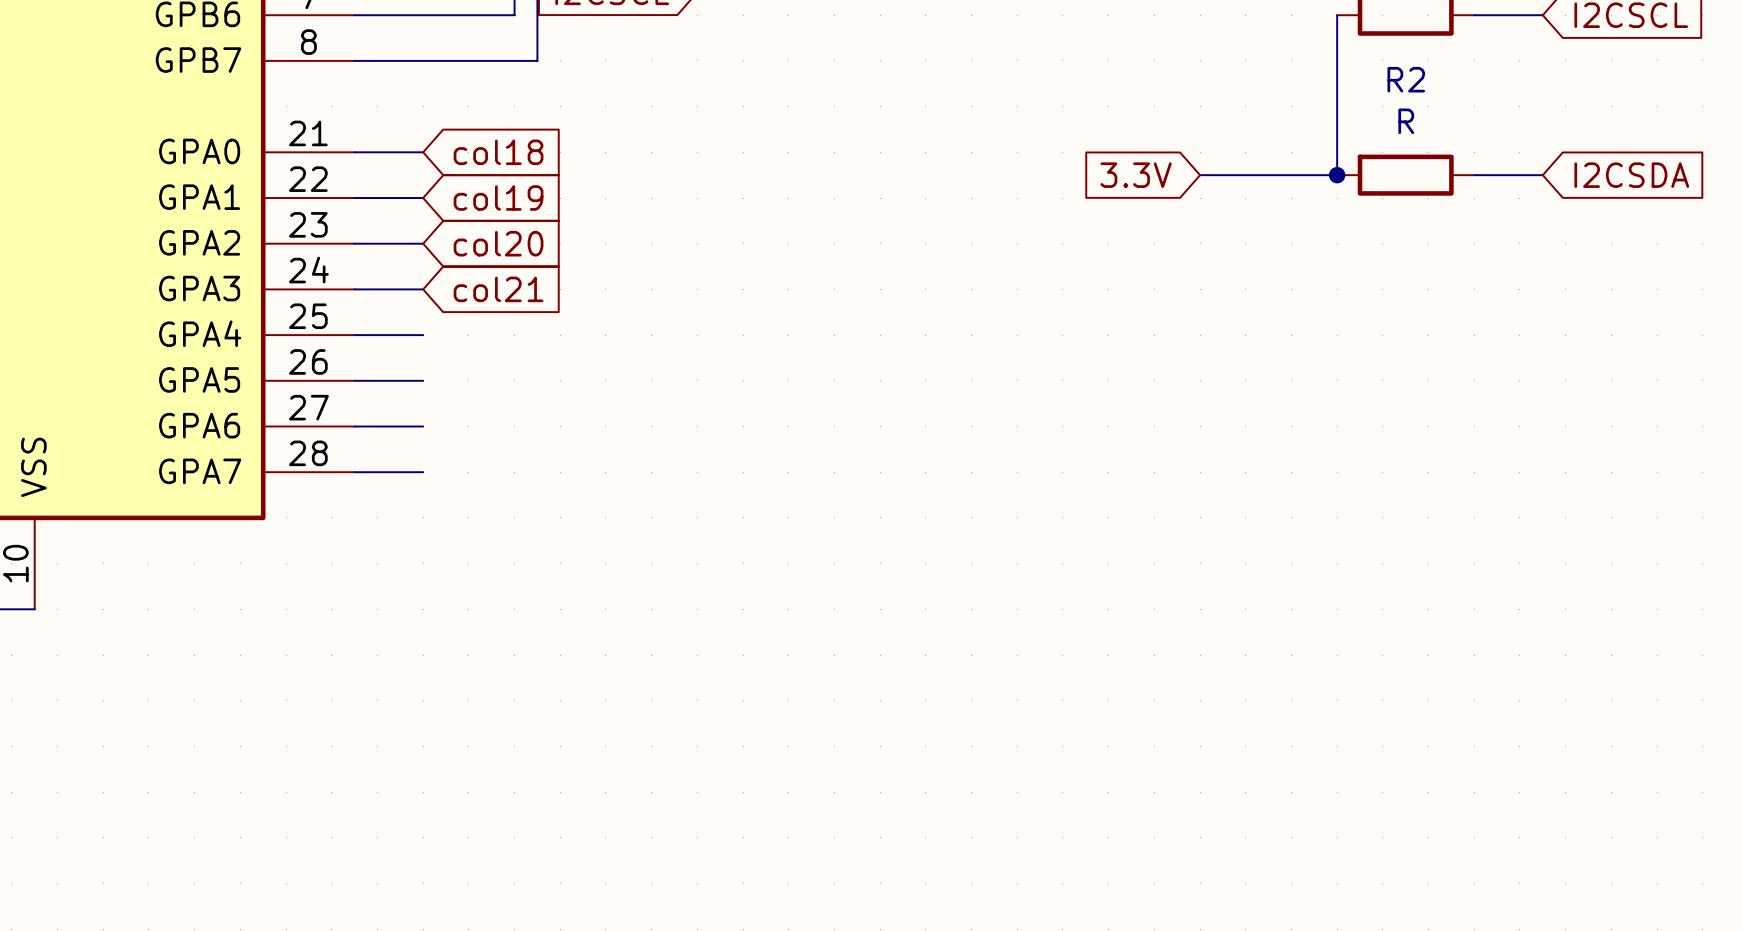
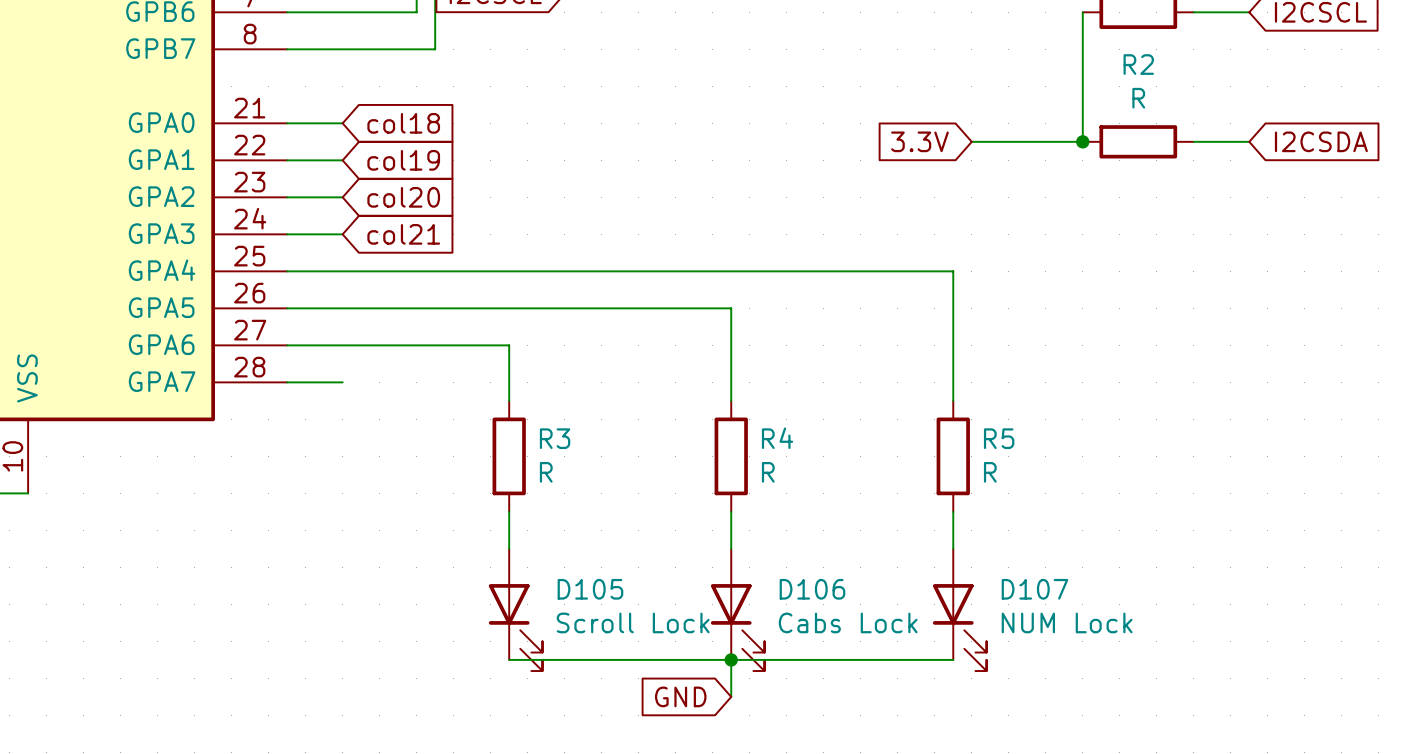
wire: none -> (342, 271) (953, 271) (953, 400)
wire: none -> (342, 308) (731, 308) (731, 400)
wire: none -> (342, 345) (509, 345) (509, 400)
R3: none -> R (509, 456)
R4: none -> R (731, 456)
R5: none -> R (953, 456)
wire: none -> (509, 511) (509, 548)
wire: none -> (731, 511) (731, 548)
wire: none -> (953, 511) (953, 548)
D105: none -> Scroll Lock (515, 609)
D106: none -> Cabs Lock (737, 609)
D107: none -> NUM Lock (959, 609)
wire: none -> (509, 659) (953, 659)
wire: none -> (731, 659) (731, 696)
junction: none -> (731, 659)
global label: none -> GND (680, 696)

